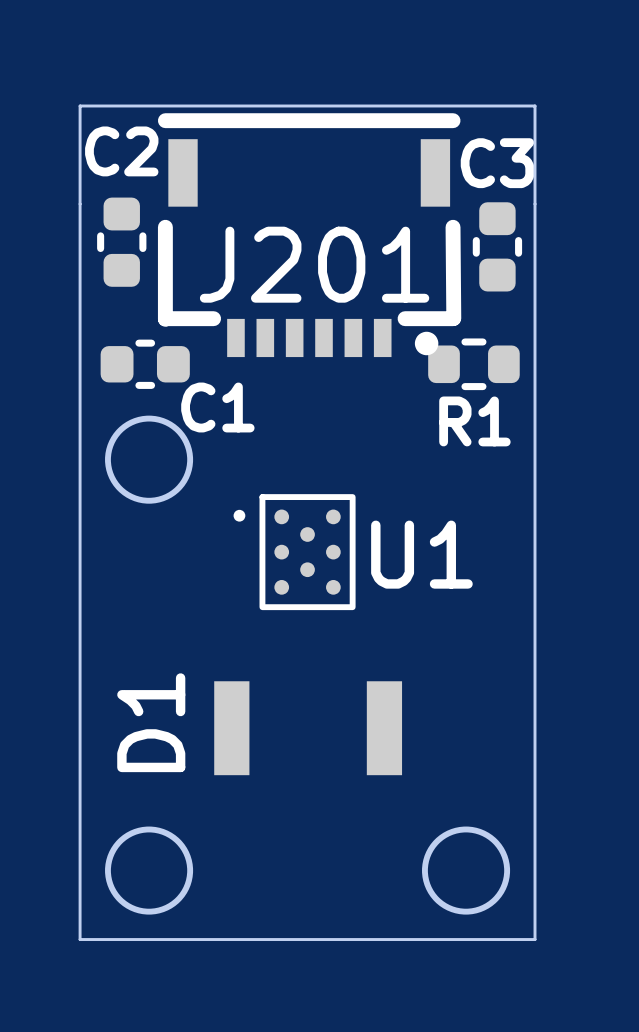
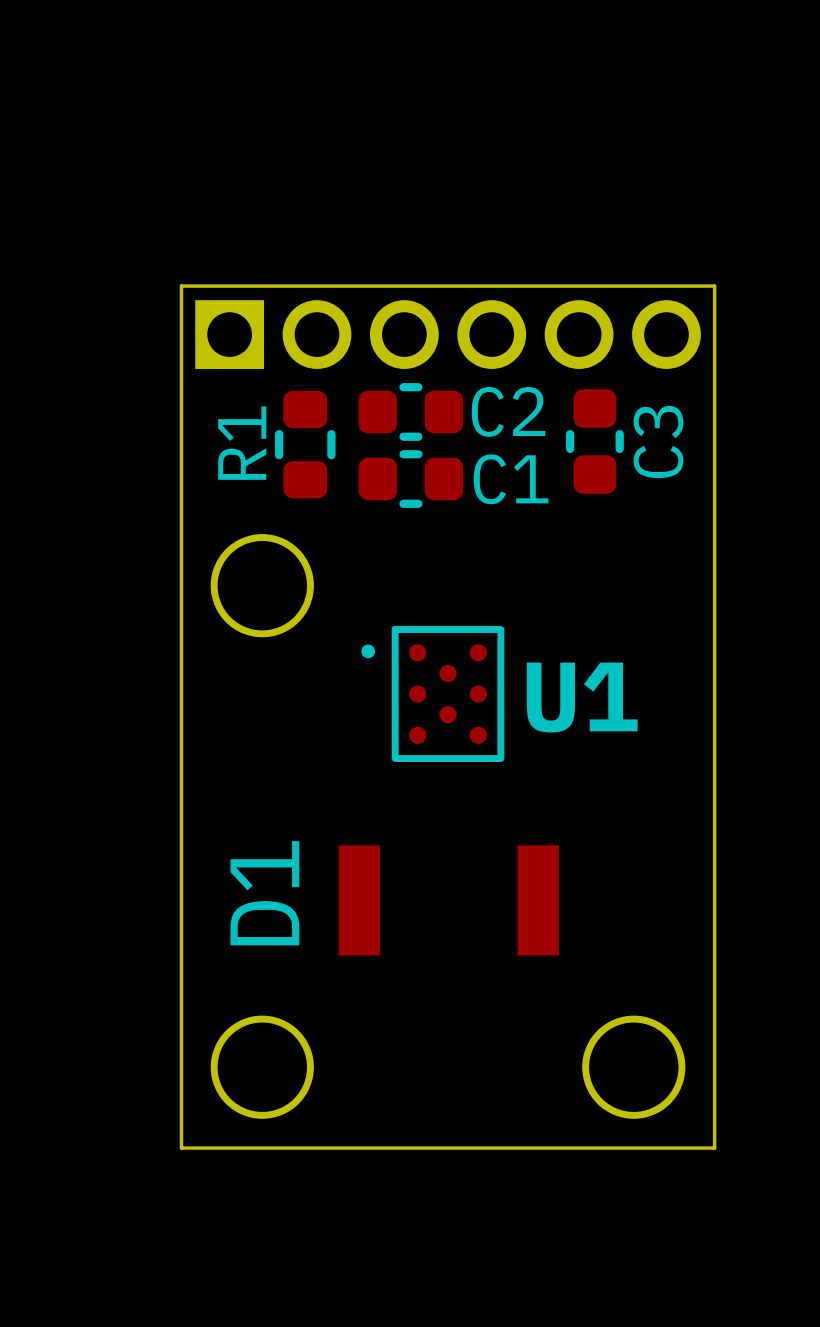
C3 name rotation: 0° (497, 163) -> 90° counterclockwise (658, 441)
board edge: (80, 204) (80, 106) (535, 106) (535, 204) -> (181, 286) (714, 286)
J201: (309, 235) -> none
C2 rotation: 0° (121, 242) -> 90° clockwise (410, 411)
C2 position: (121, 242) -> (410, 411)
part: none -> (448, 334)
C3 position: (497, 246) -> (594, 441)
C1 position: (145, 364) -> (410, 479)
R1 rotation: 0° (473, 364) -> 90° clockwise (305, 444)
R1 position: (473, 364) -> (305, 444)
C1 name position: C1 (217, 407) -> C1 (511, 479)

